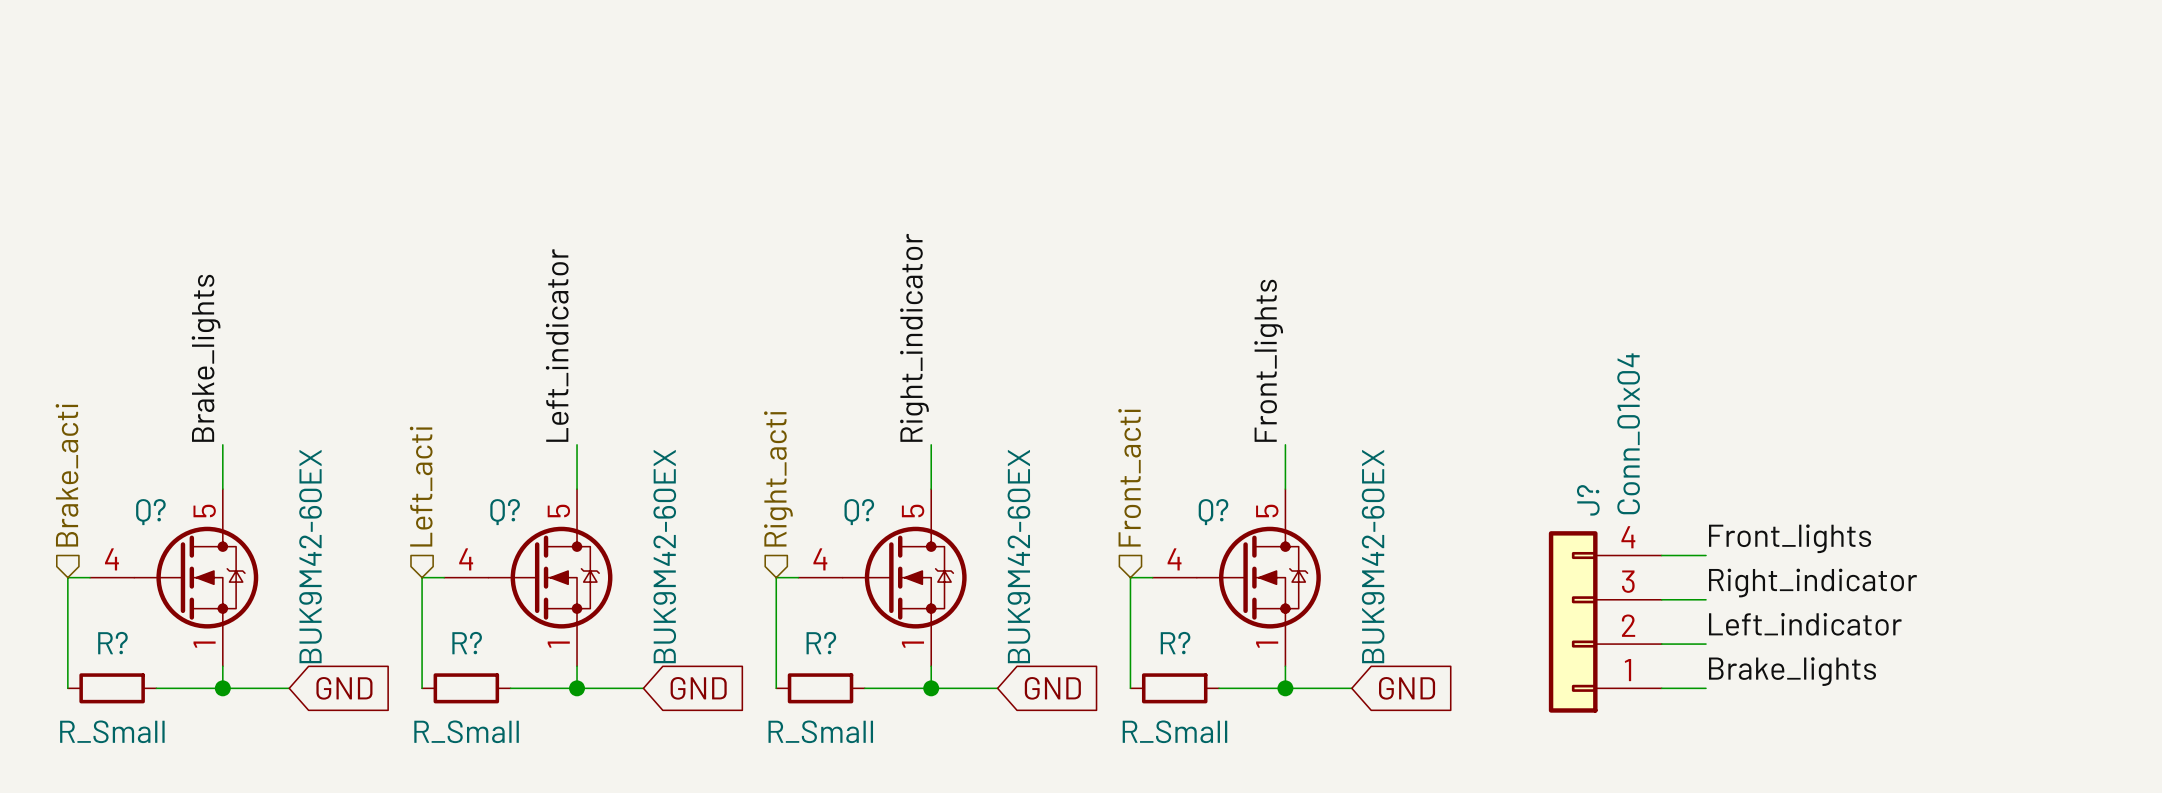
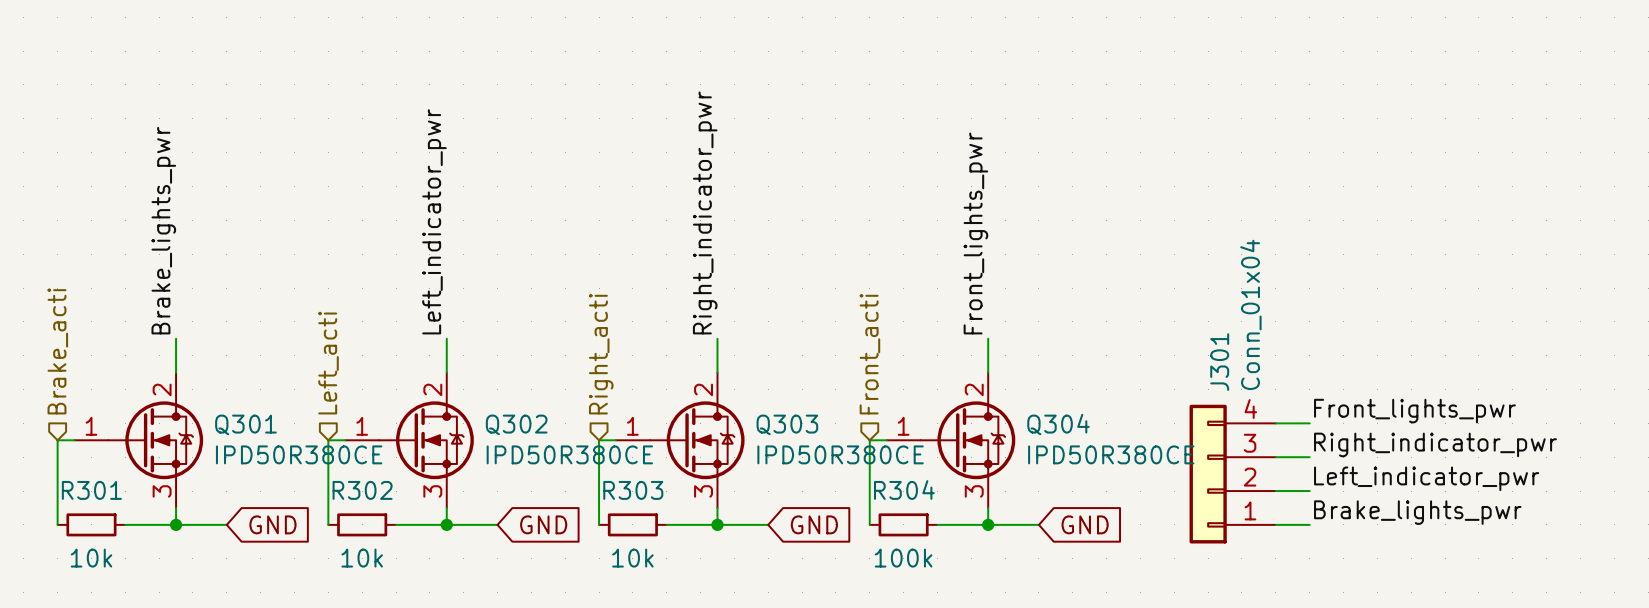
label: Right_indicator (914, 337) -> Right_indicator_pwr (705, 212)
label: Left_indicator (557, 345) -> Left_indicator_pwr (434, 221)
label: Brake_lights (206, 358) -> Brake_lights_pwr (163, 230)
label: Front_lights (1268, 360) -> Front_lights_pwr (975, 233)
J? name: J? (1588, 500) -> J301 (1219, 362)
Q? pin number: 5 (204, 510) -> 2 (162, 389)
Q? pin number: 5 (558, 510) -> 2 (432, 389)
Q? pin number: 5 (913, 510) -> 2 (703, 389)
Q? pin number: 5 (1267, 510) -> 2 (974, 389)
Q? name: Q? (150, 512) -> Q301 (245, 424)
Q? name: Q? (505, 512) -> Q302 (516, 424)
Q? name: Q? (859, 512) -> Q303 (787, 424)
Q? name: Q? (1213, 512) -> Q304 (1058, 424)
label: Front_lights (1790, 538) -> Front_lights_pwr (1414, 411)
Q? value: BUK9M42-60EX (310, 556) -> IPD50R380CE (299, 454)
Q? value: BUK9M42-60EX (664, 556) -> IPD50R380CE (569, 454)
Q? value: BUK9M42-60EX (1018, 556) -> IPD50R380CE (840, 454)
Q? value: BUK9M42-60EX (1373, 556) -> IPD50R380CE (1111, 454)
Q? pin number: 4 (111, 559) -> 1 (91, 426)
Q? pin number: 4 (466, 559) -> 1 (362, 426)
Q? pin number: 4 (820, 559) -> 1 (632, 426)
Q? pin number: 4 (1174, 559) -> 1 (903, 426)
label: Right_indicator (1813, 583) -> Right_indicator_pwr (1435, 444)
label: Left_indicator (1805, 624) -> Left_indicator_pwr (1426, 478)
R? name: R? (112, 643) -> R301 (91, 490)
R? name: R? (467, 643) -> R302 (362, 490)
R? name: R? (821, 643) -> R303 (633, 490)
R? name: R? (1175, 643) -> R304 (904, 490)
Q? pin number: 1 (204, 644) -> 3 (162, 491)
Q? pin number: 1 (558, 644) -> 3 (432, 491)
Q? pin number: 1 (912, 644) -> 3 (703, 491)
Q? pin number: 1 (1267, 644) -> 3 (974, 491)
label: Brake_lights (1792, 671) -> Brake_lights_pwr (1417, 512)
R? value: R_Small (112, 731) -> 10k (91, 558)
R? value: R_Small (466, 731) -> 10k (362, 558)
R? value: R_Small (820, 731) -> 10k (632, 558)
R? value: R_Small (1174, 731) -> 100k (903, 558)

